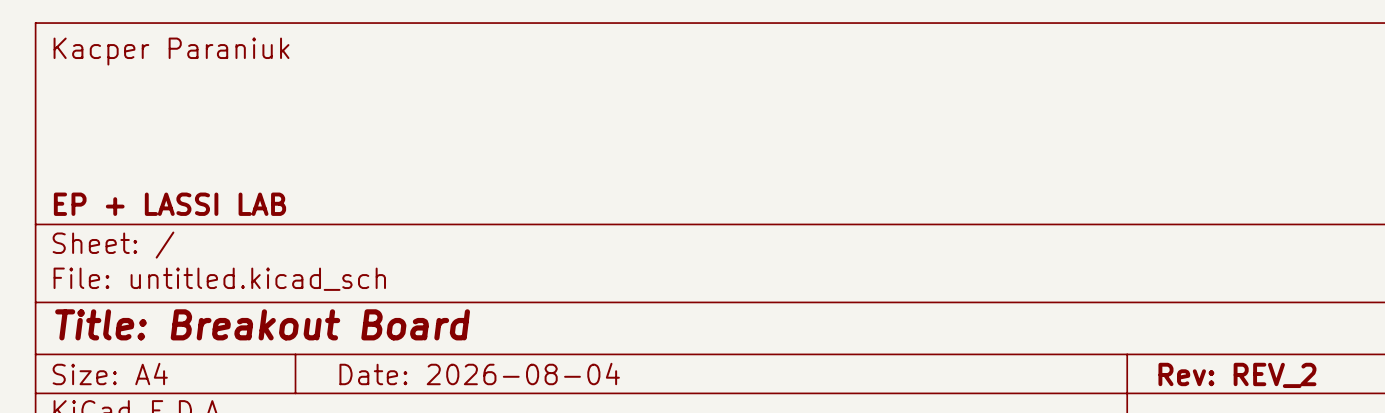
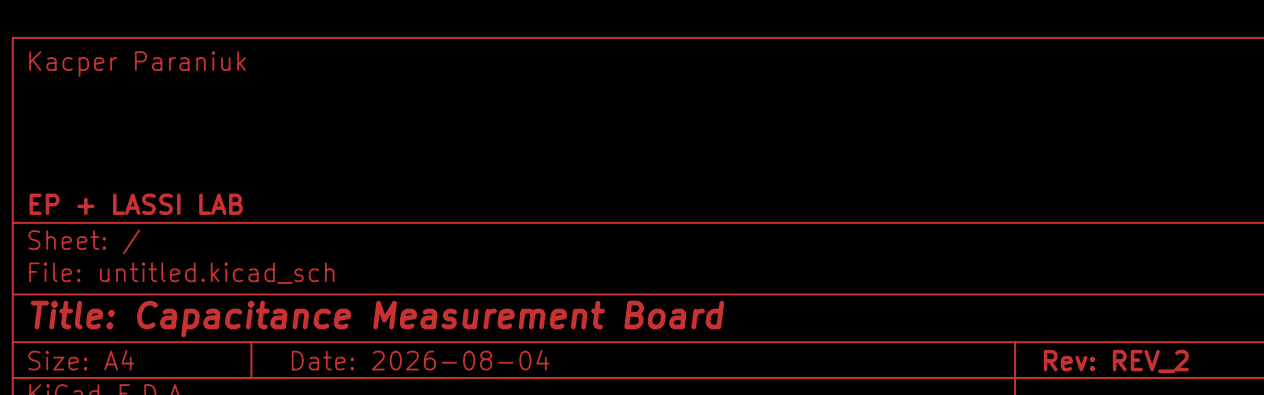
title block: Title: Breakout Board (262, 324) -> Title: Capacitance Measurement Board (377, 319)

